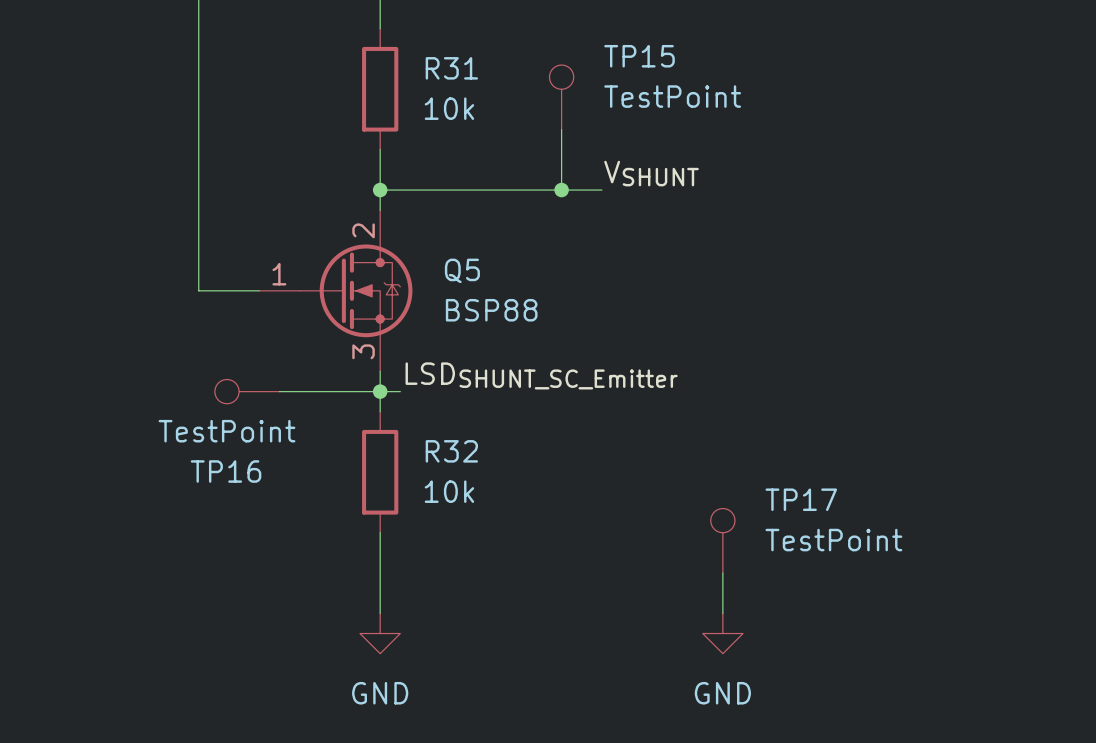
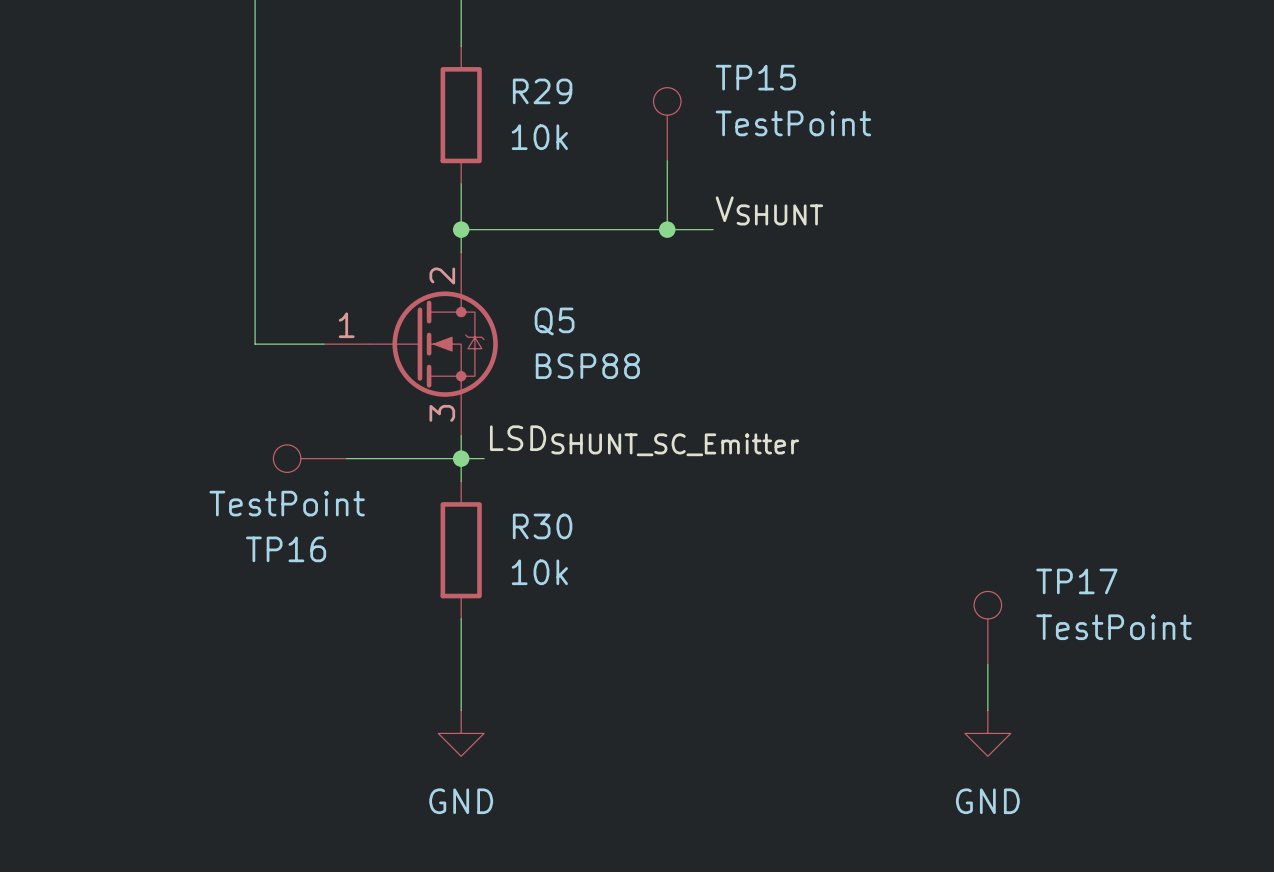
R31 name: R31 (451, 68) -> R29 (542, 91)
R32 name: R32 (451, 451) -> R30 (542, 526)
TP17 position: (722, 540) -> (987, 628)
wire: (722, 573) (722, 613) -> (987, 664) (987, 710)
power symbol position: GND (722, 633) -> GND (987, 733)

